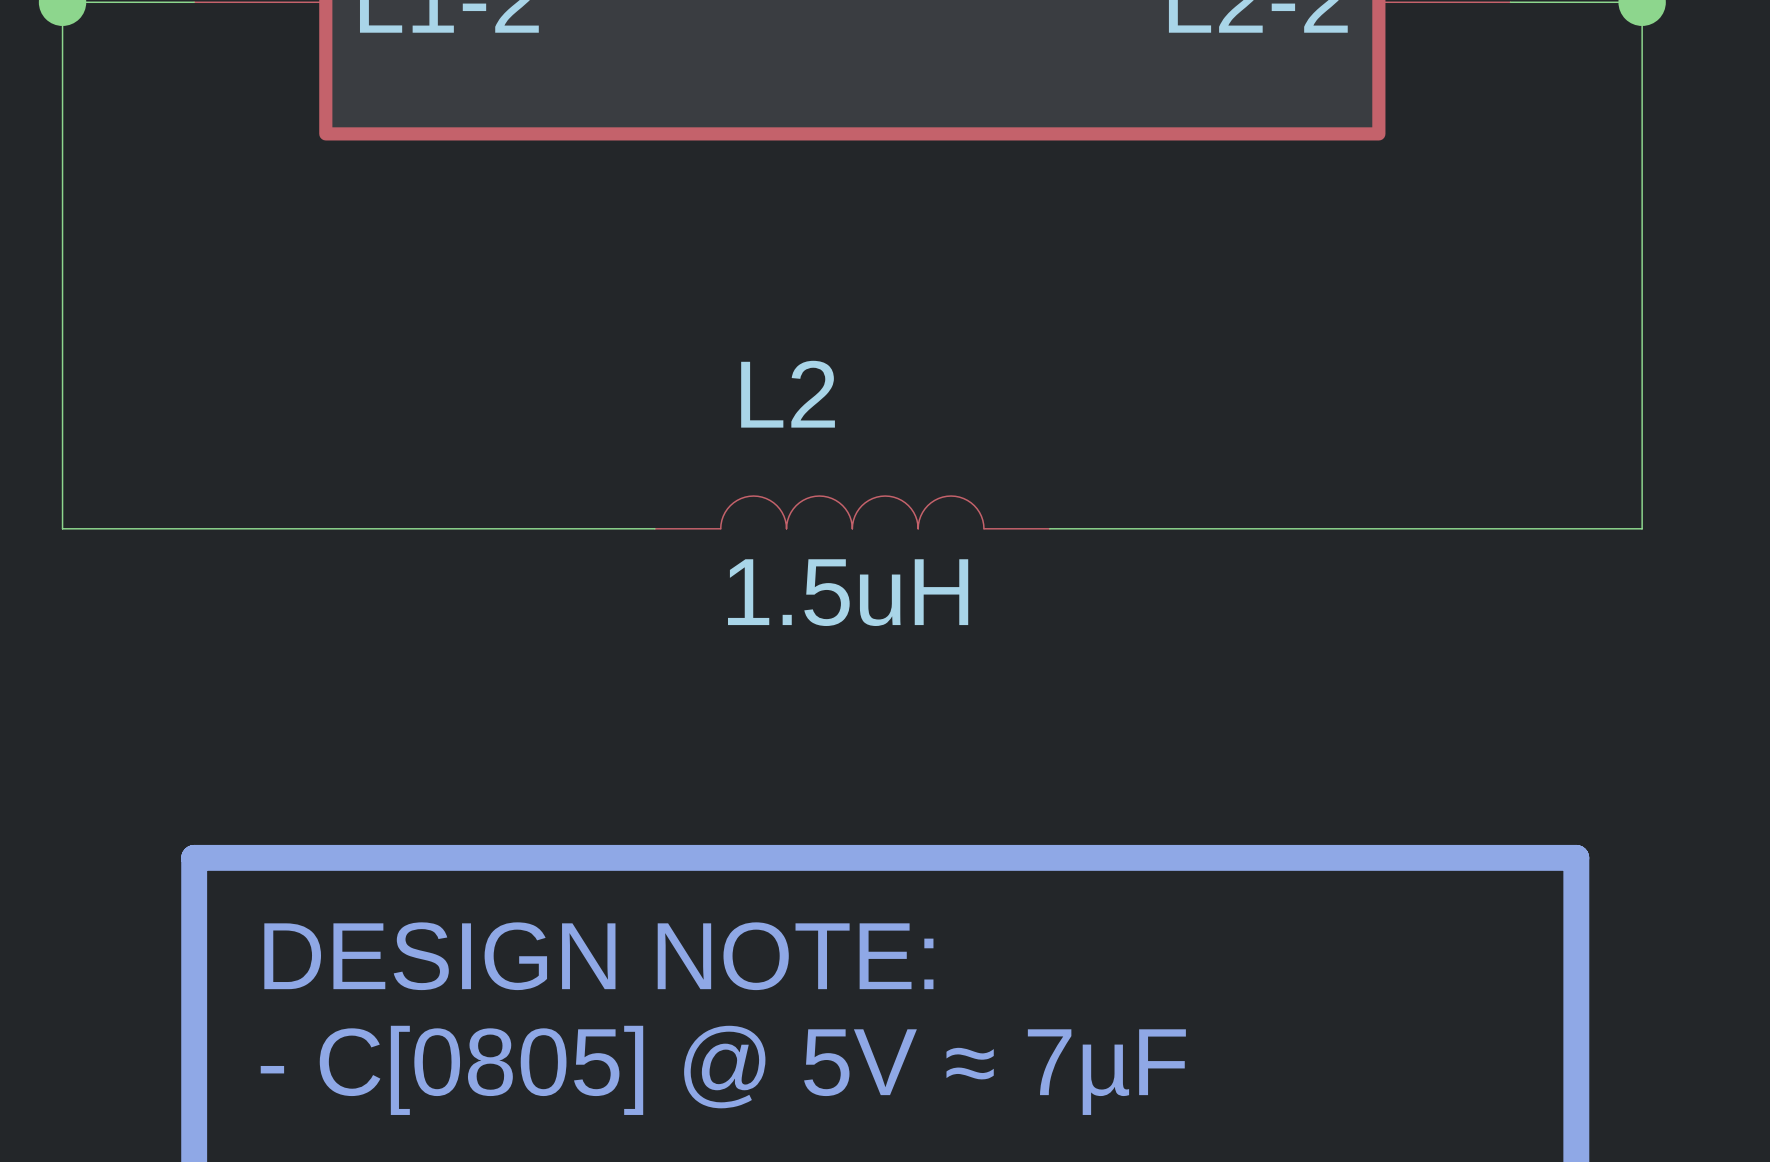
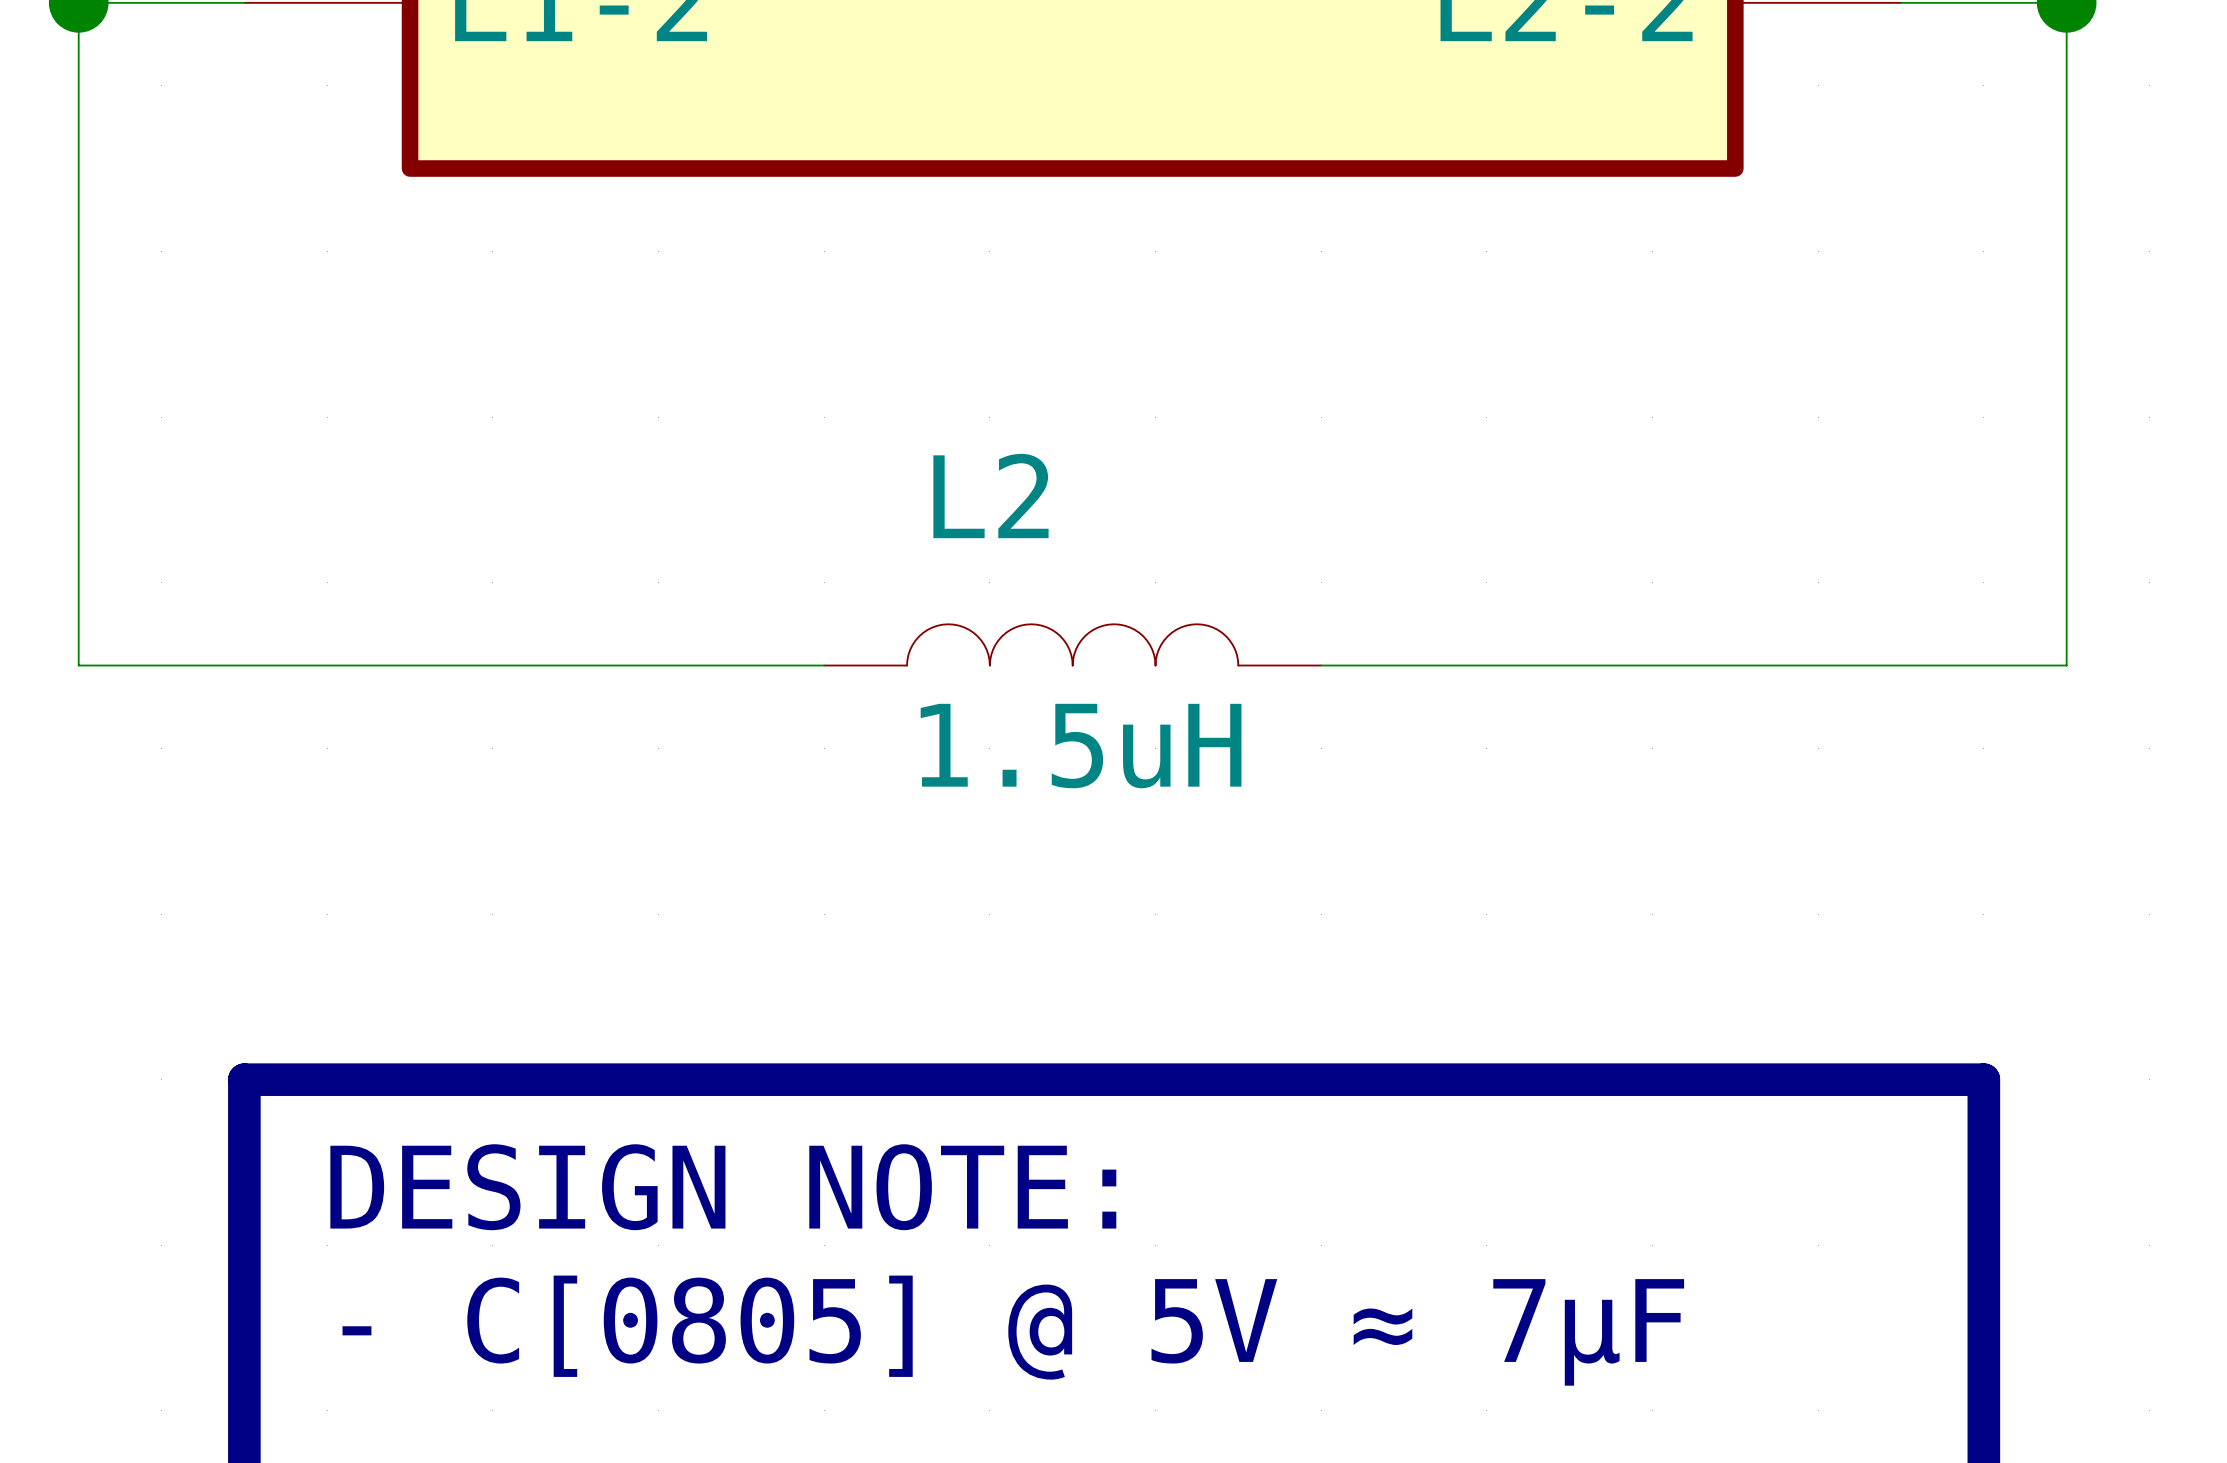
text position: DESIGN NOTE: (598, 956) -> DESIGN NOTE: (723, 1187)
text position: - C[0805] @ 5V ≈ 7µF (723, 1070) -> - C[0805] @ 5V ≈ 7µF (1013, 1330)

